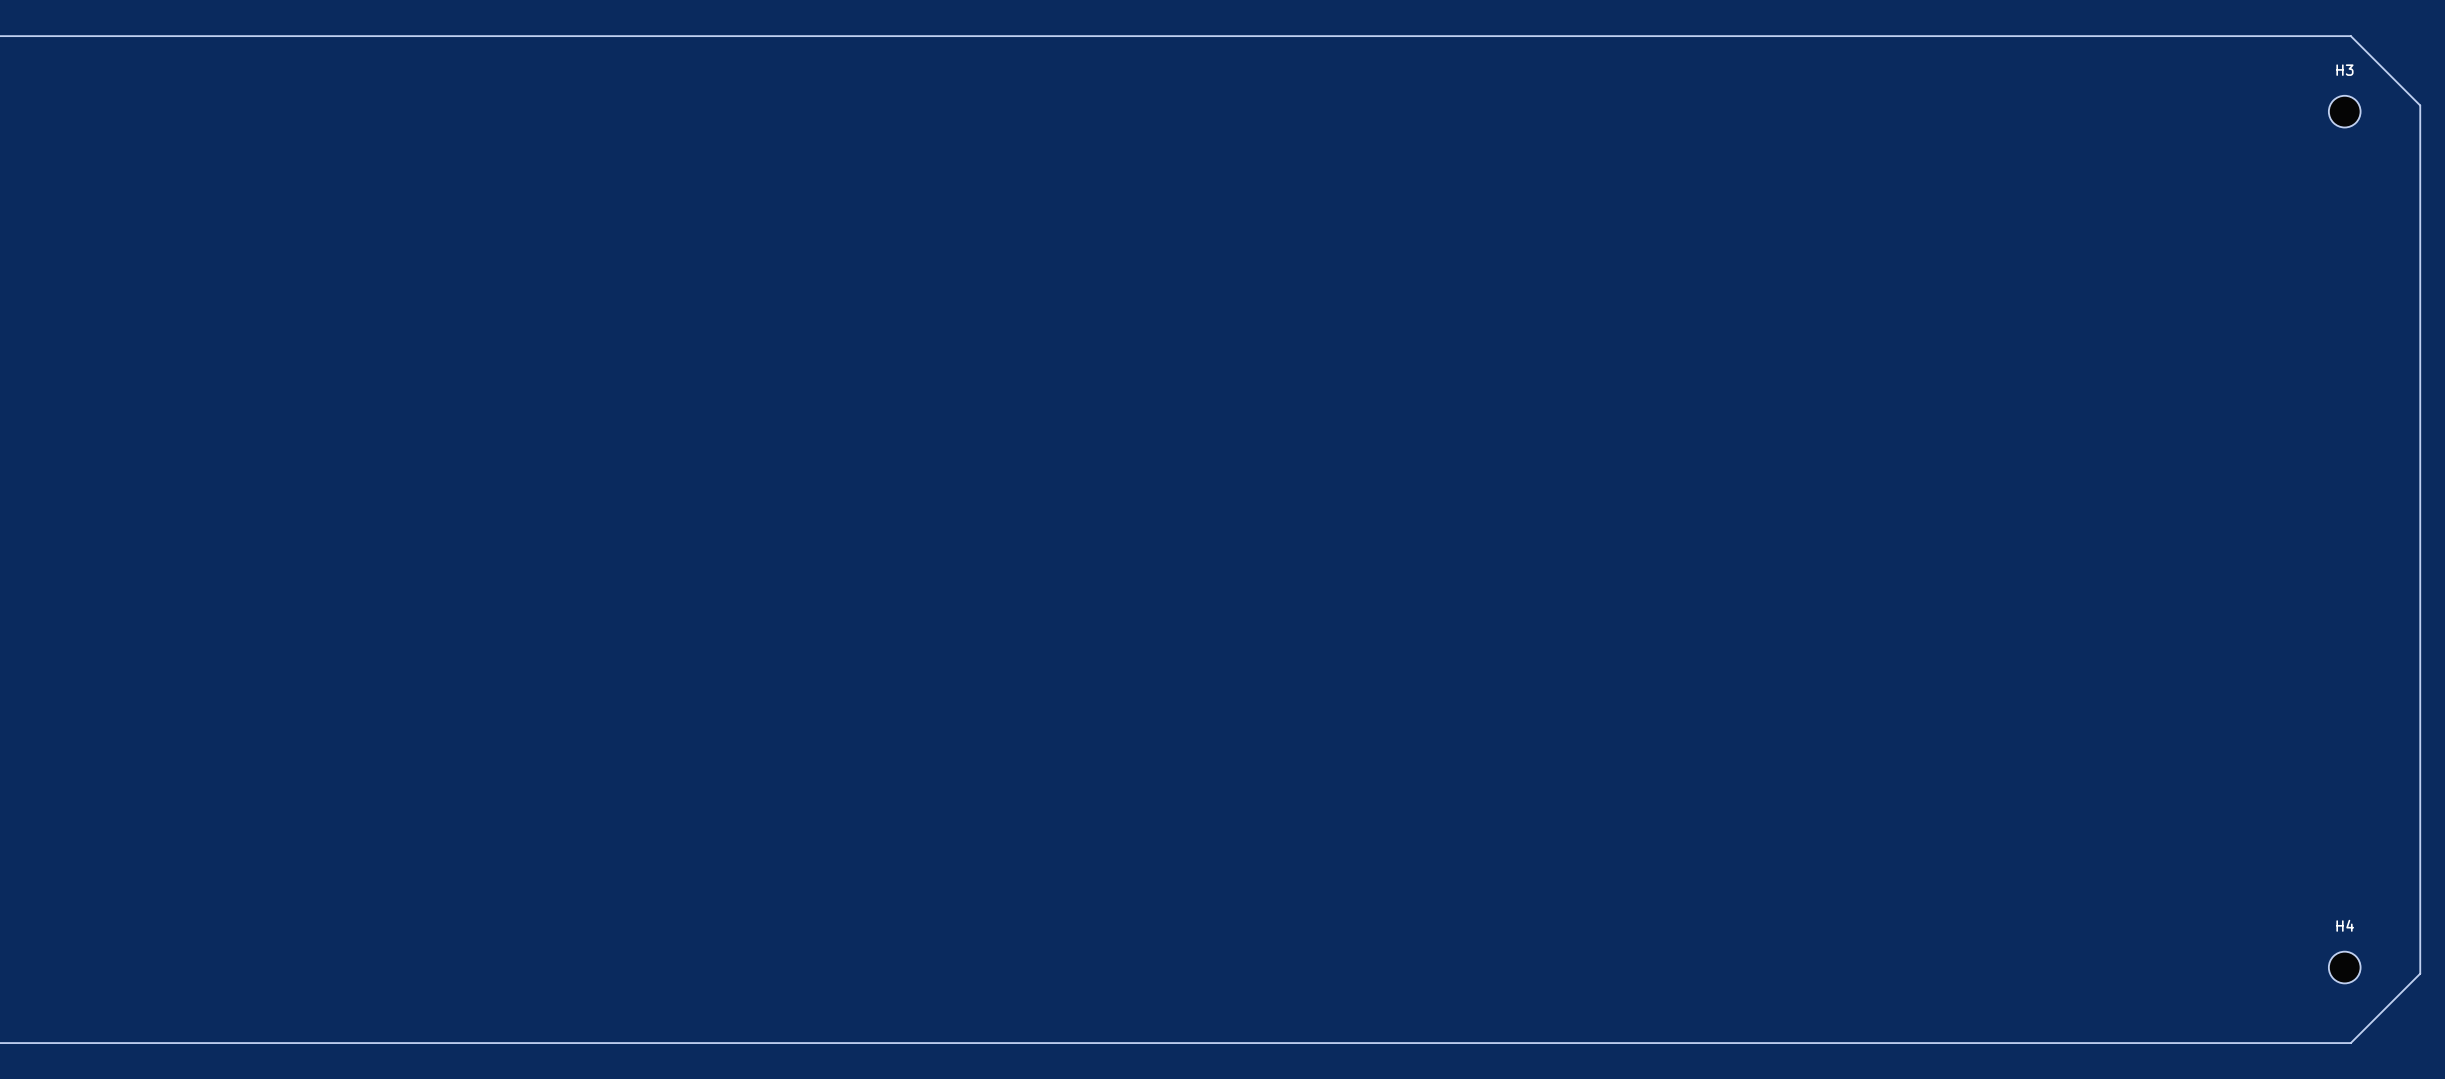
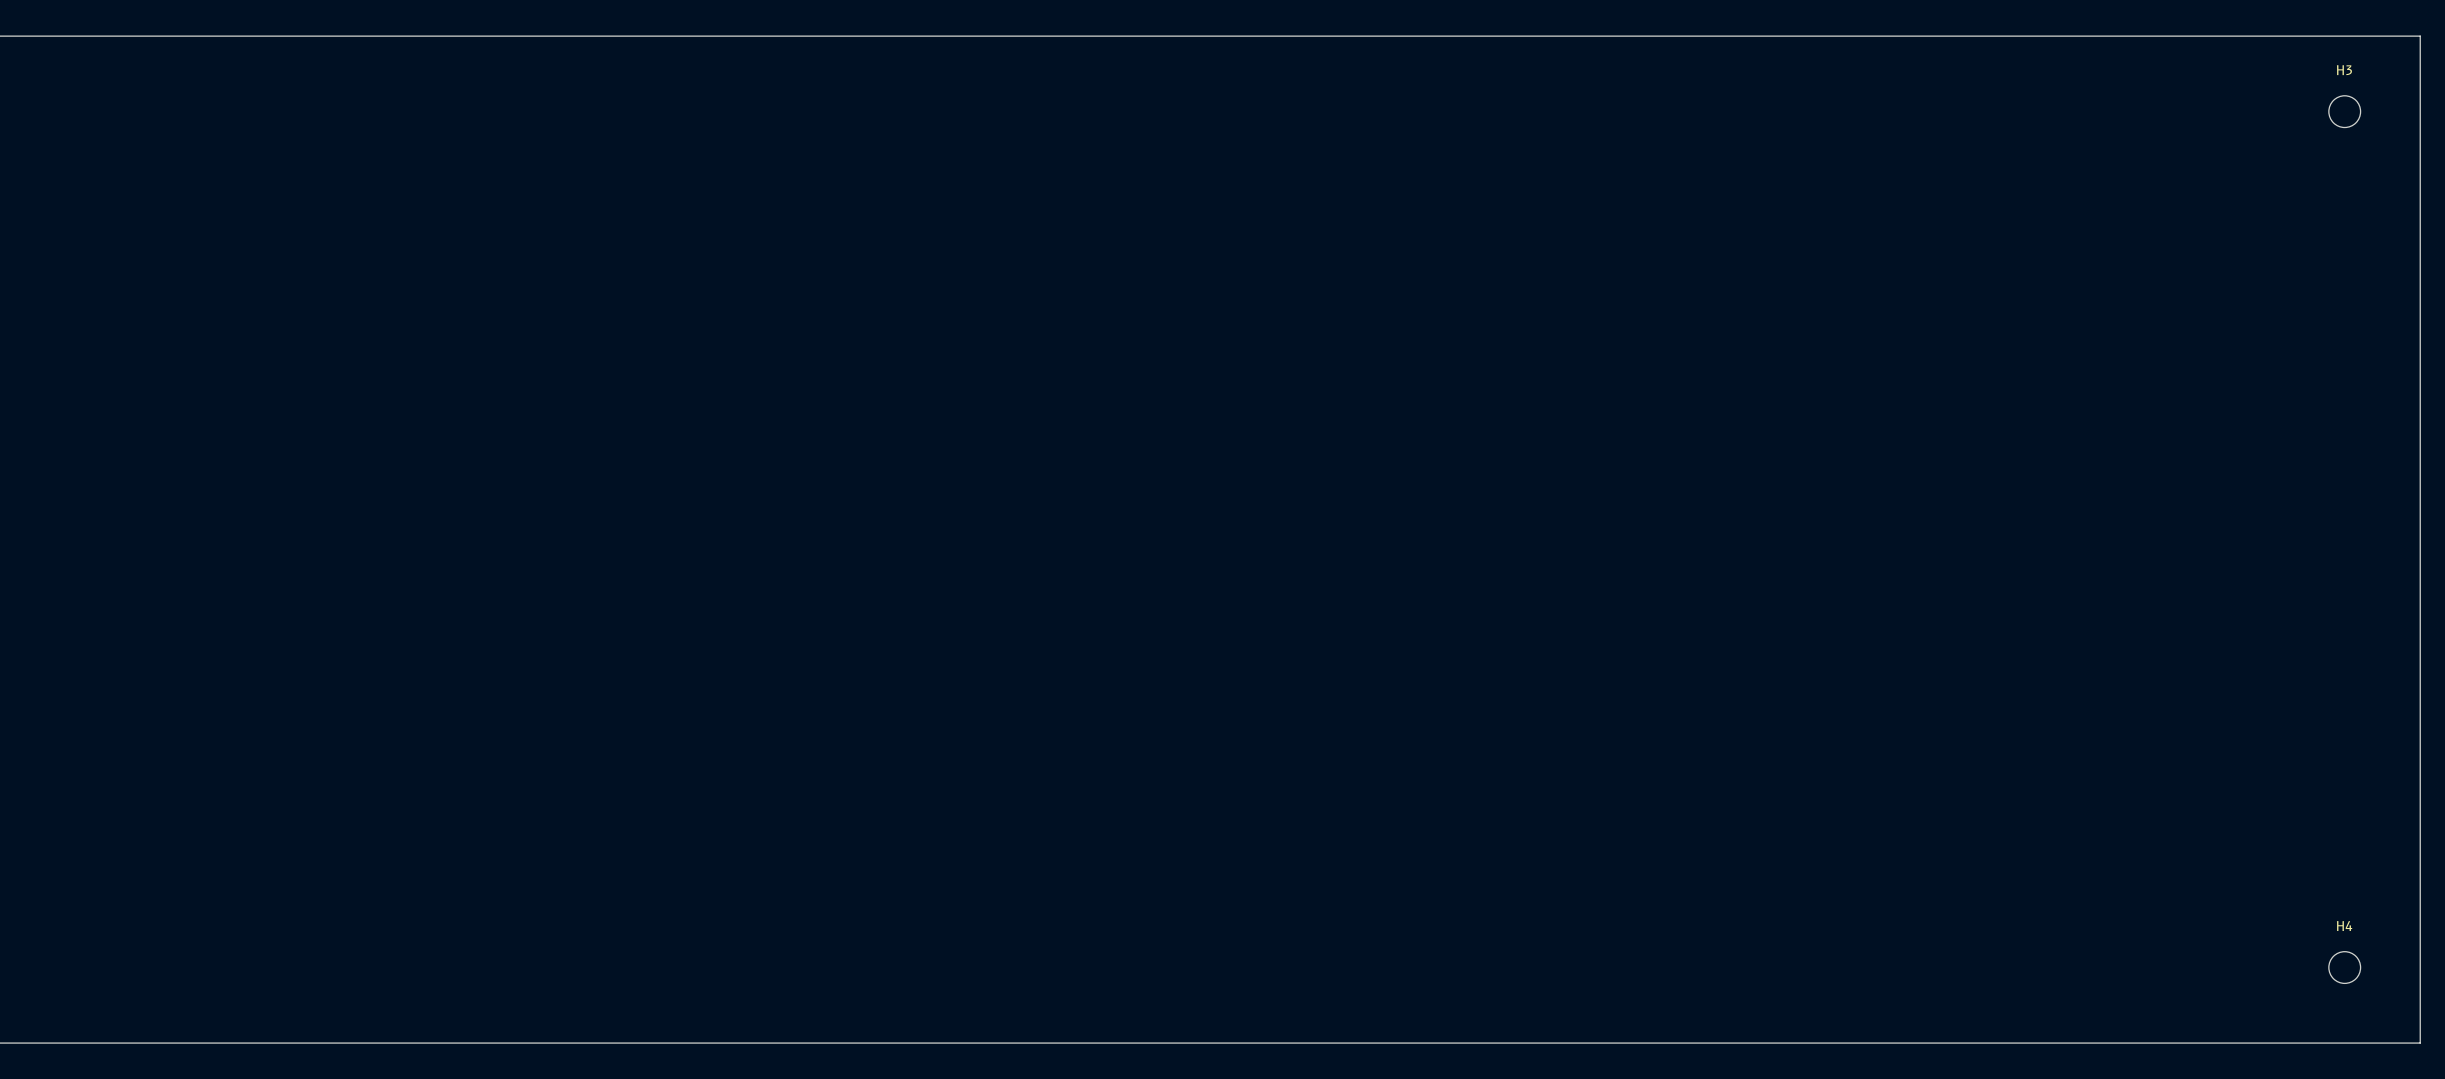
board edge: (2350, 36) (2420, 105) -> (2350, 36) (2420, 36) (2420, 105)
board edge: (2420, 973) (2350, 1043) -> (2420, 973) (2420, 1043) (2350, 1043)

